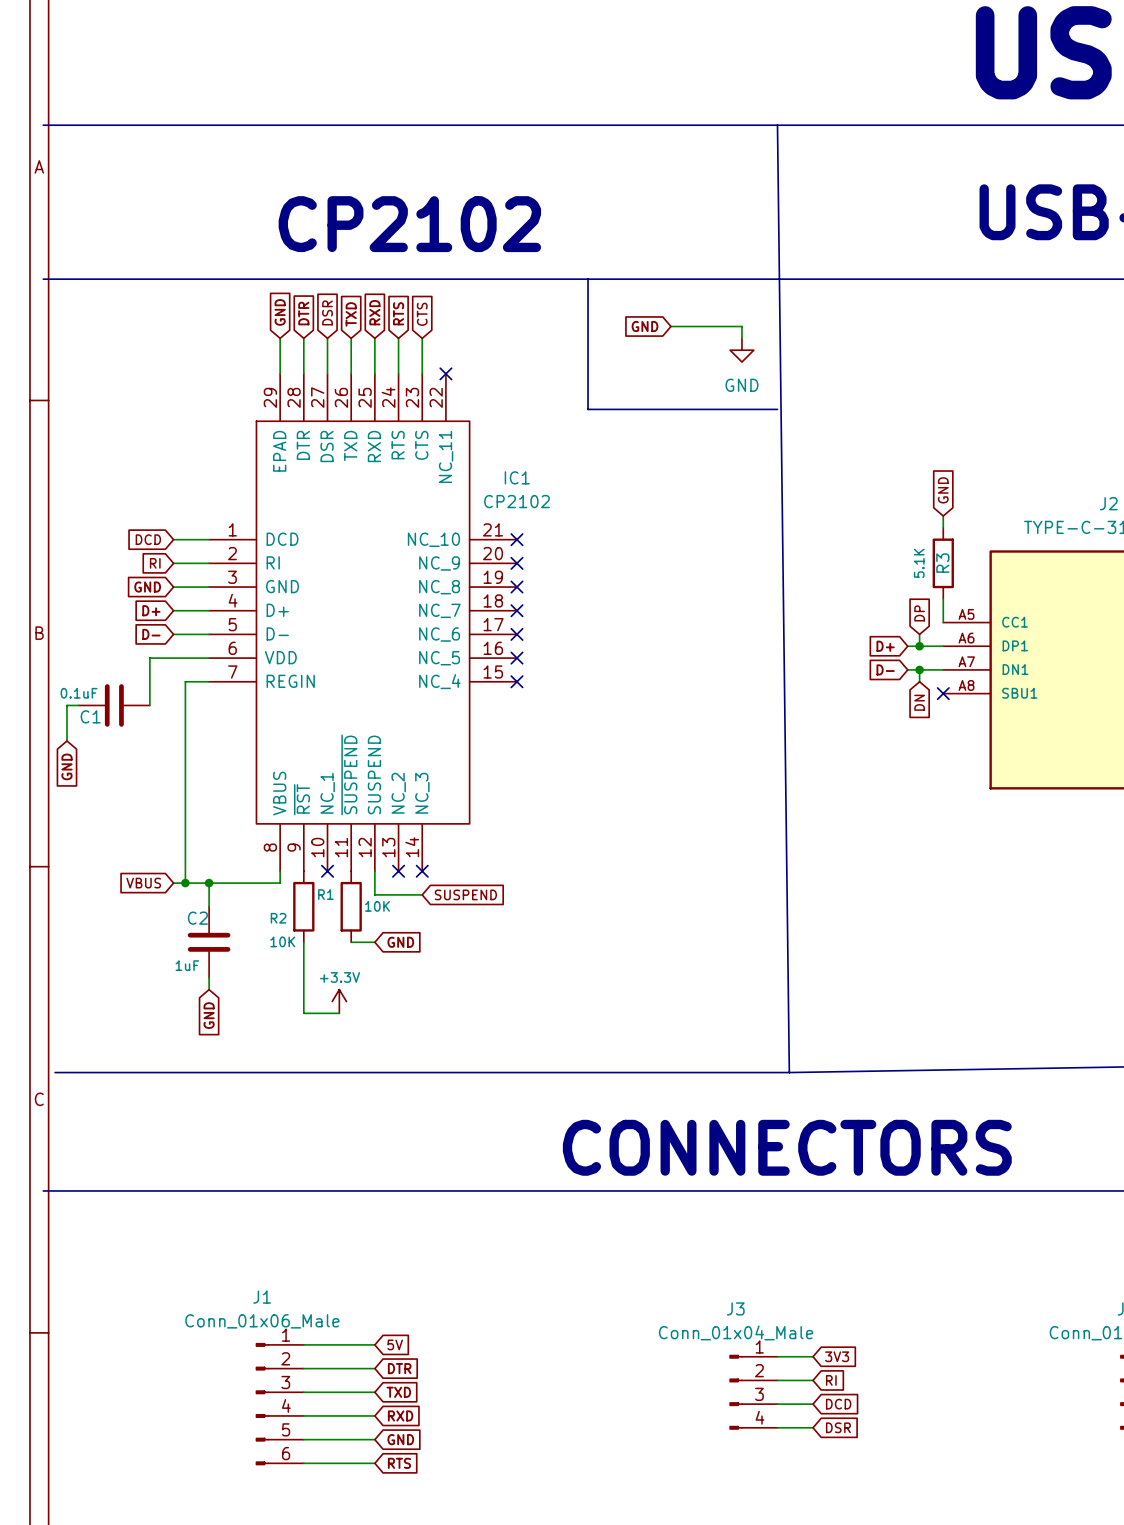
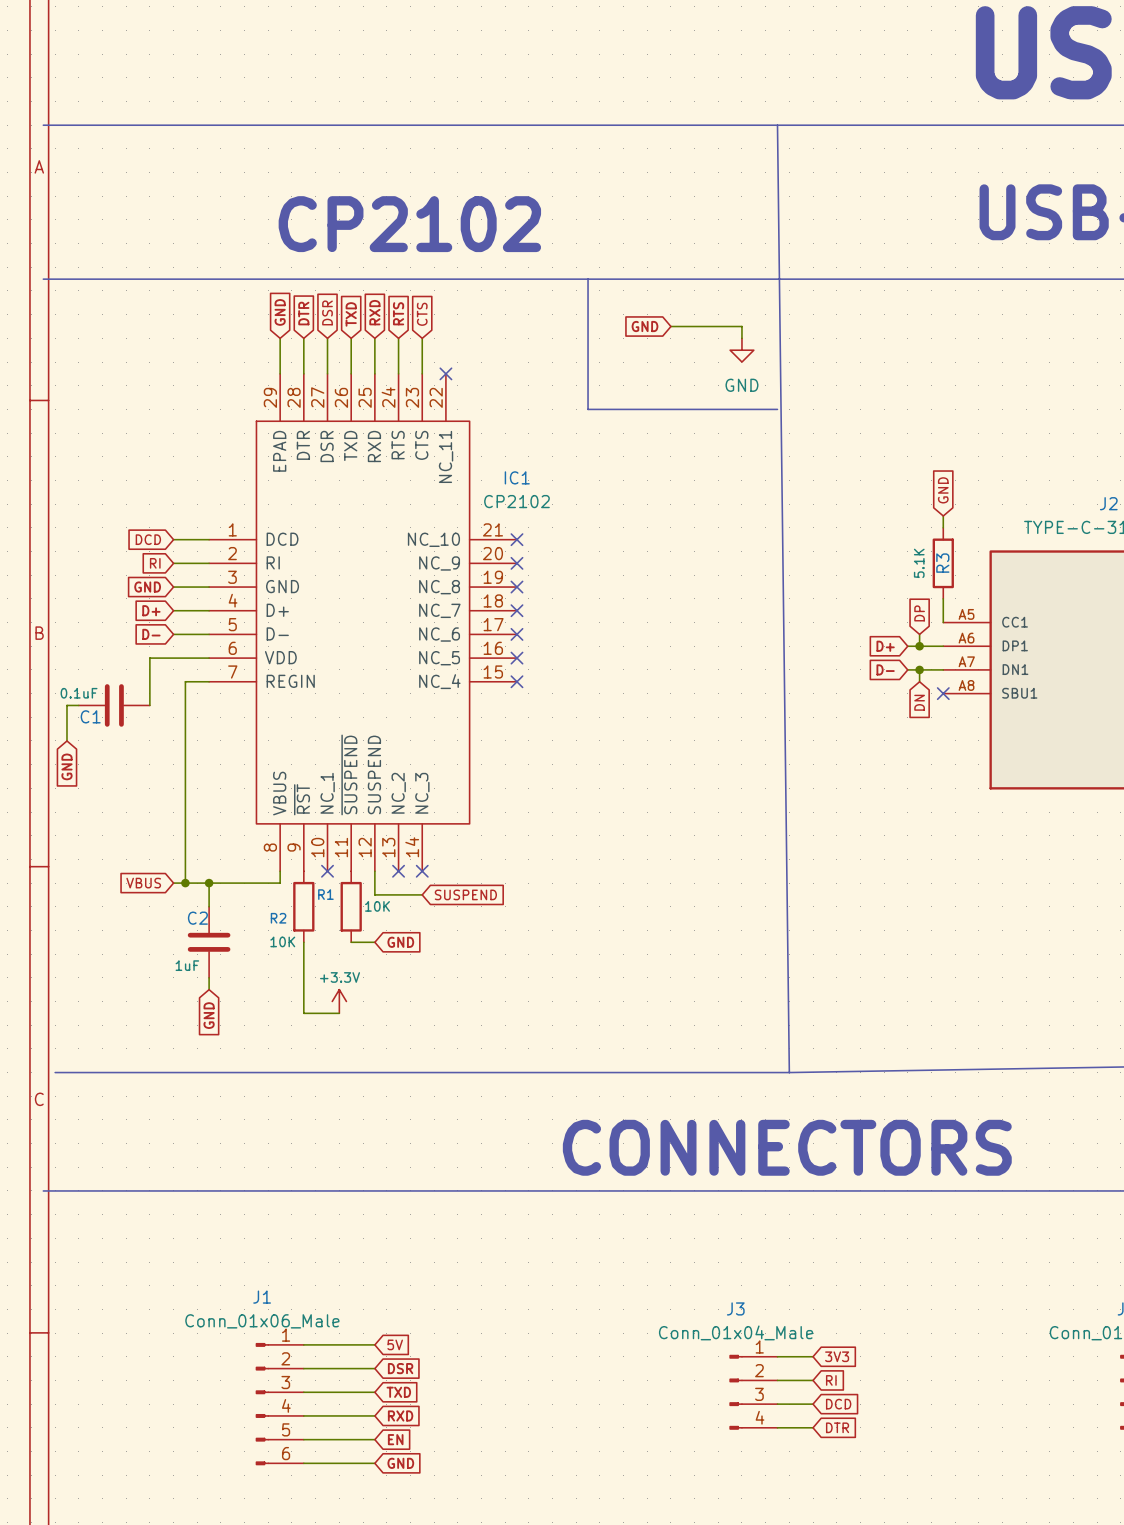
global label: DTR (399, 1368) -> DSR (400, 1368)
global label: DSR (838, 1427) -> DTR (837, 1427)
global label: GND (400, 1439) -> EN (395, 1439)
global label: RTS (399, 1463) -> GND (400, 1463)

